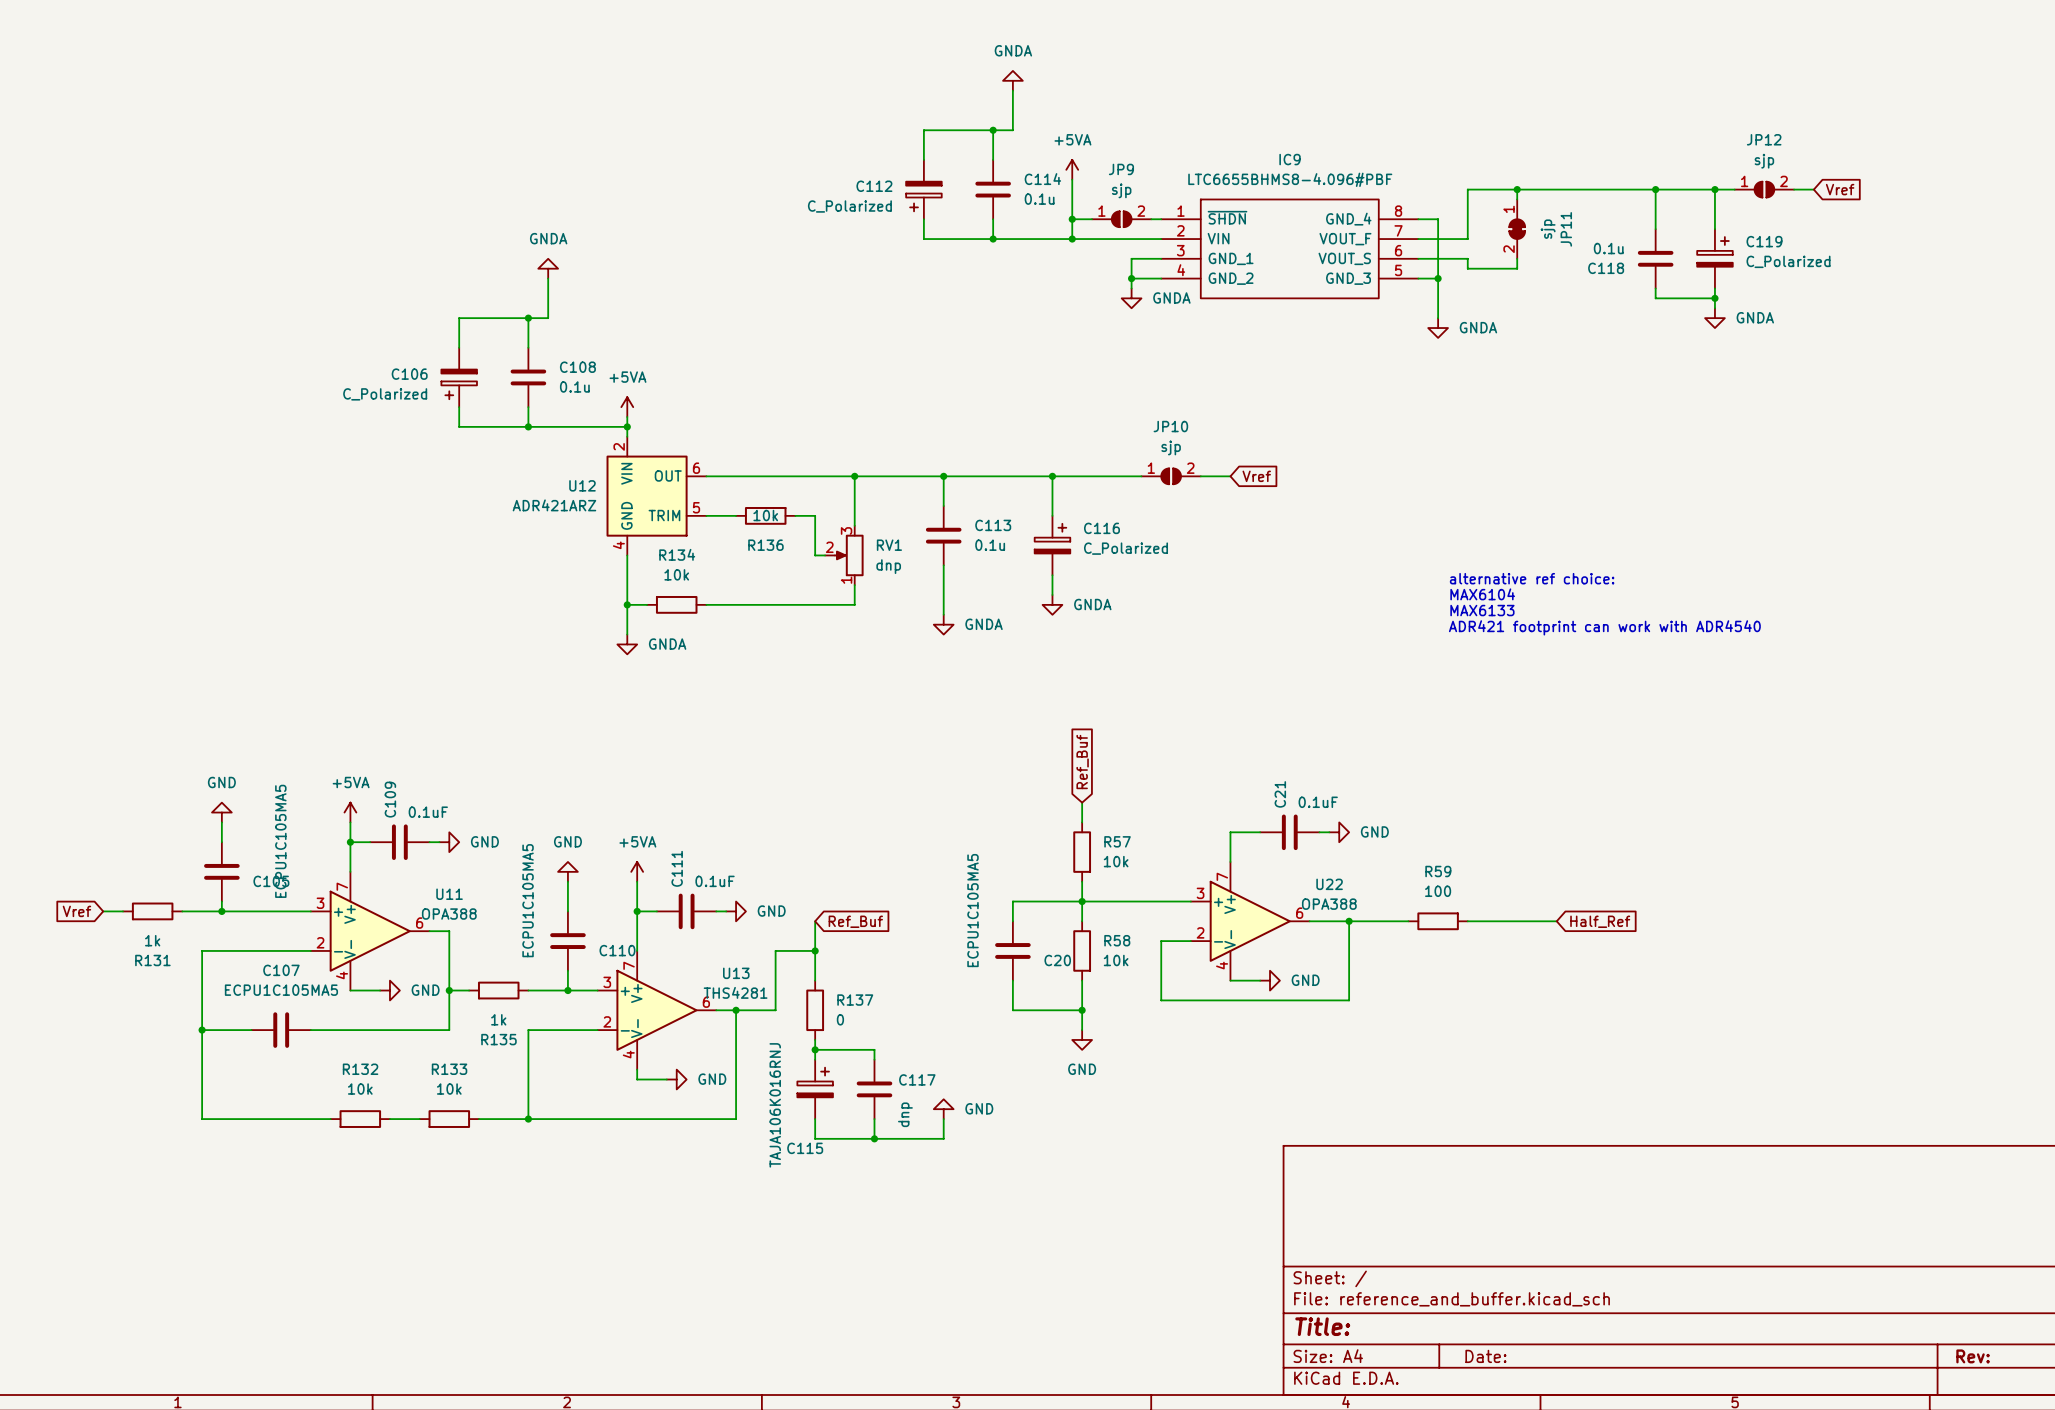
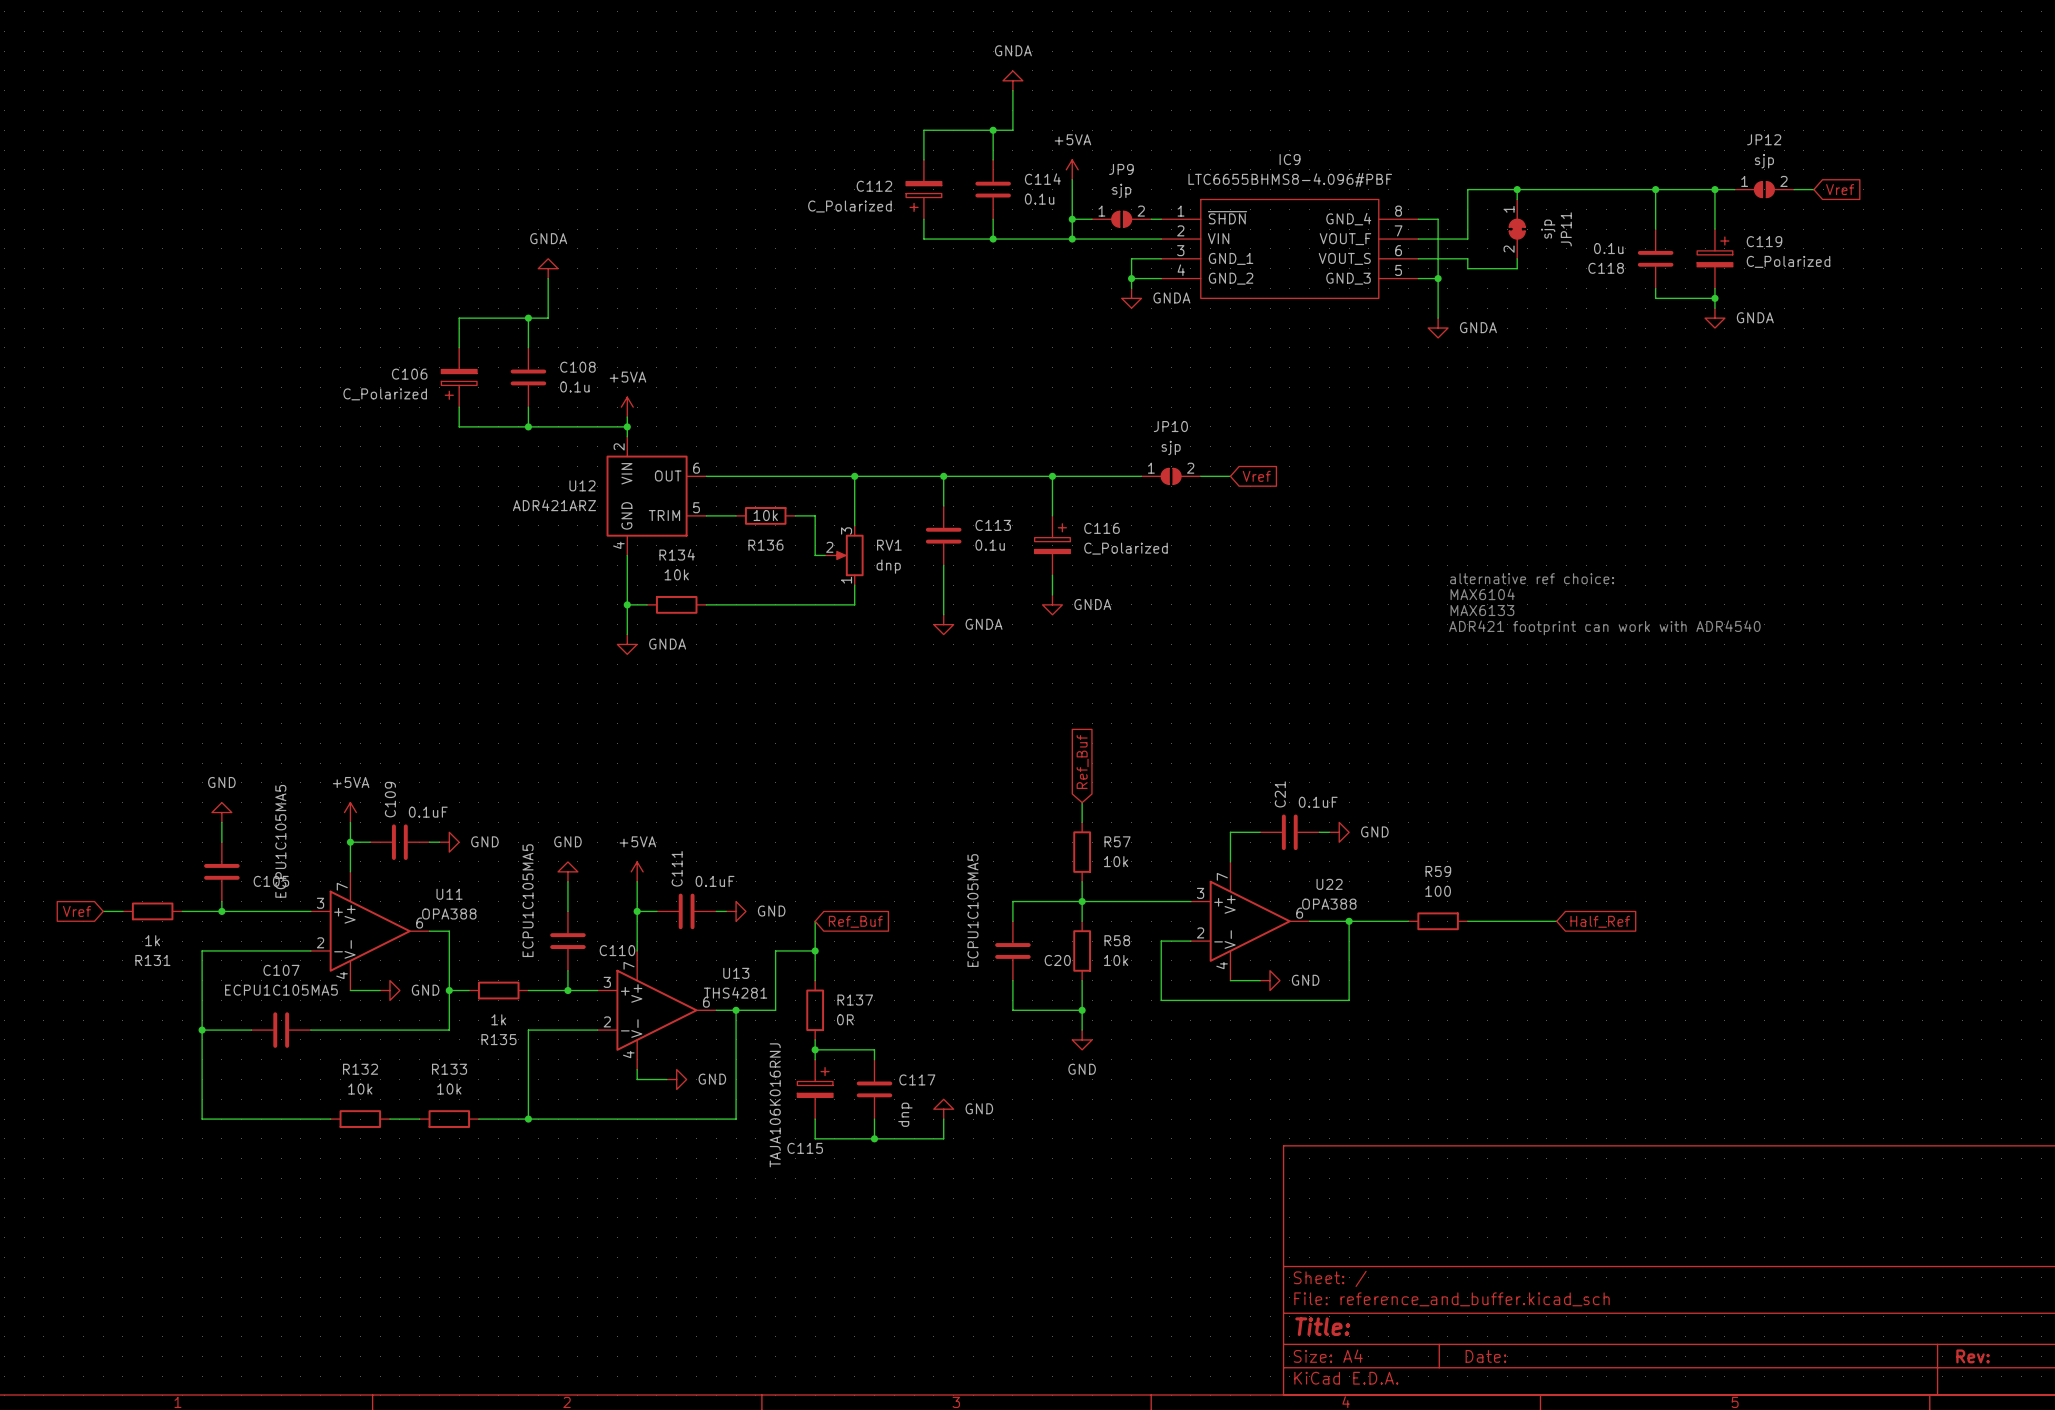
R137 value: 0 (840, 1019) -> 0R (845, 1019)

